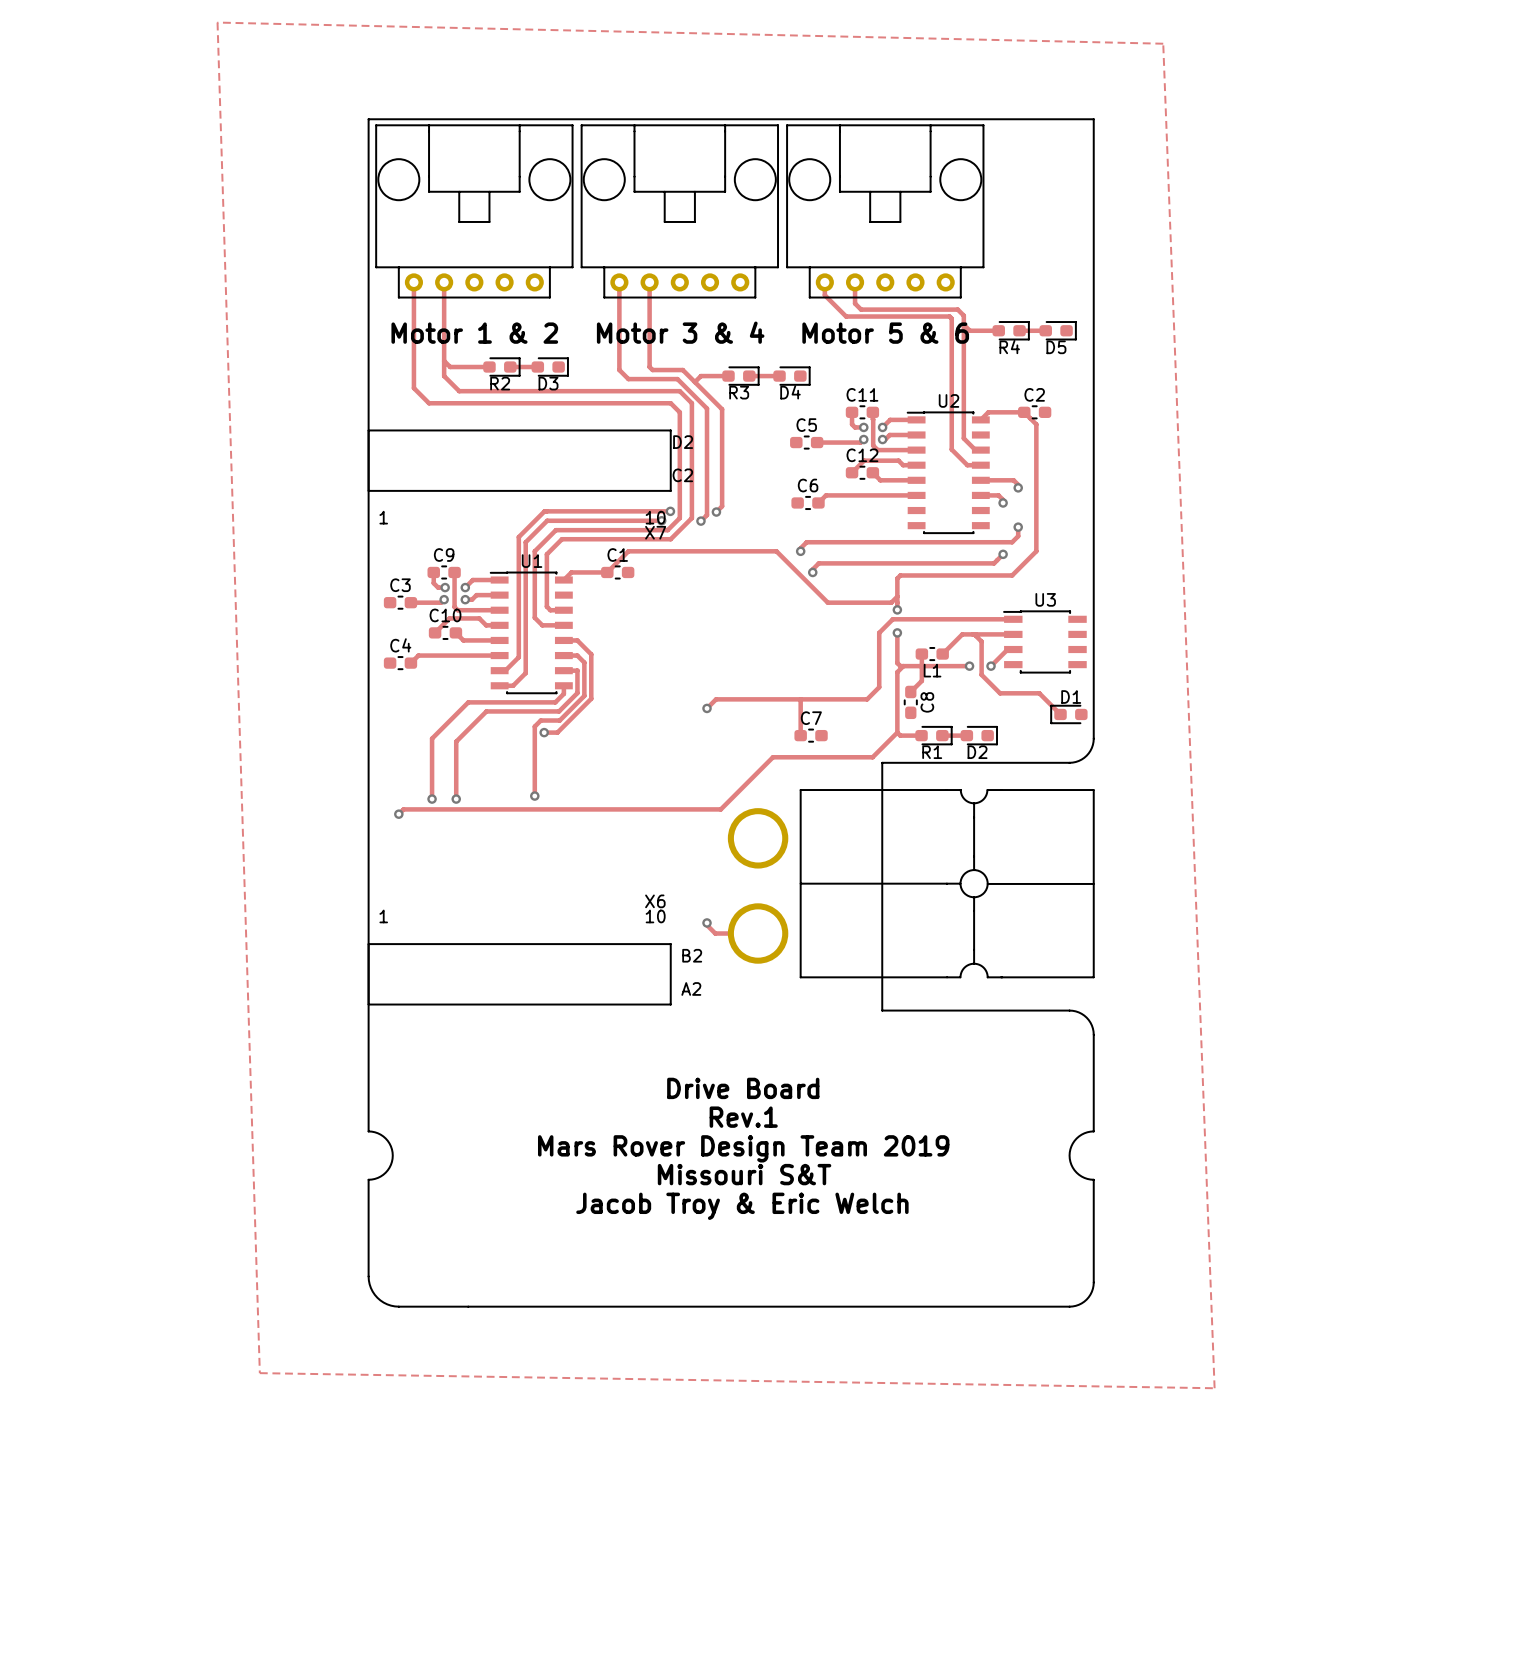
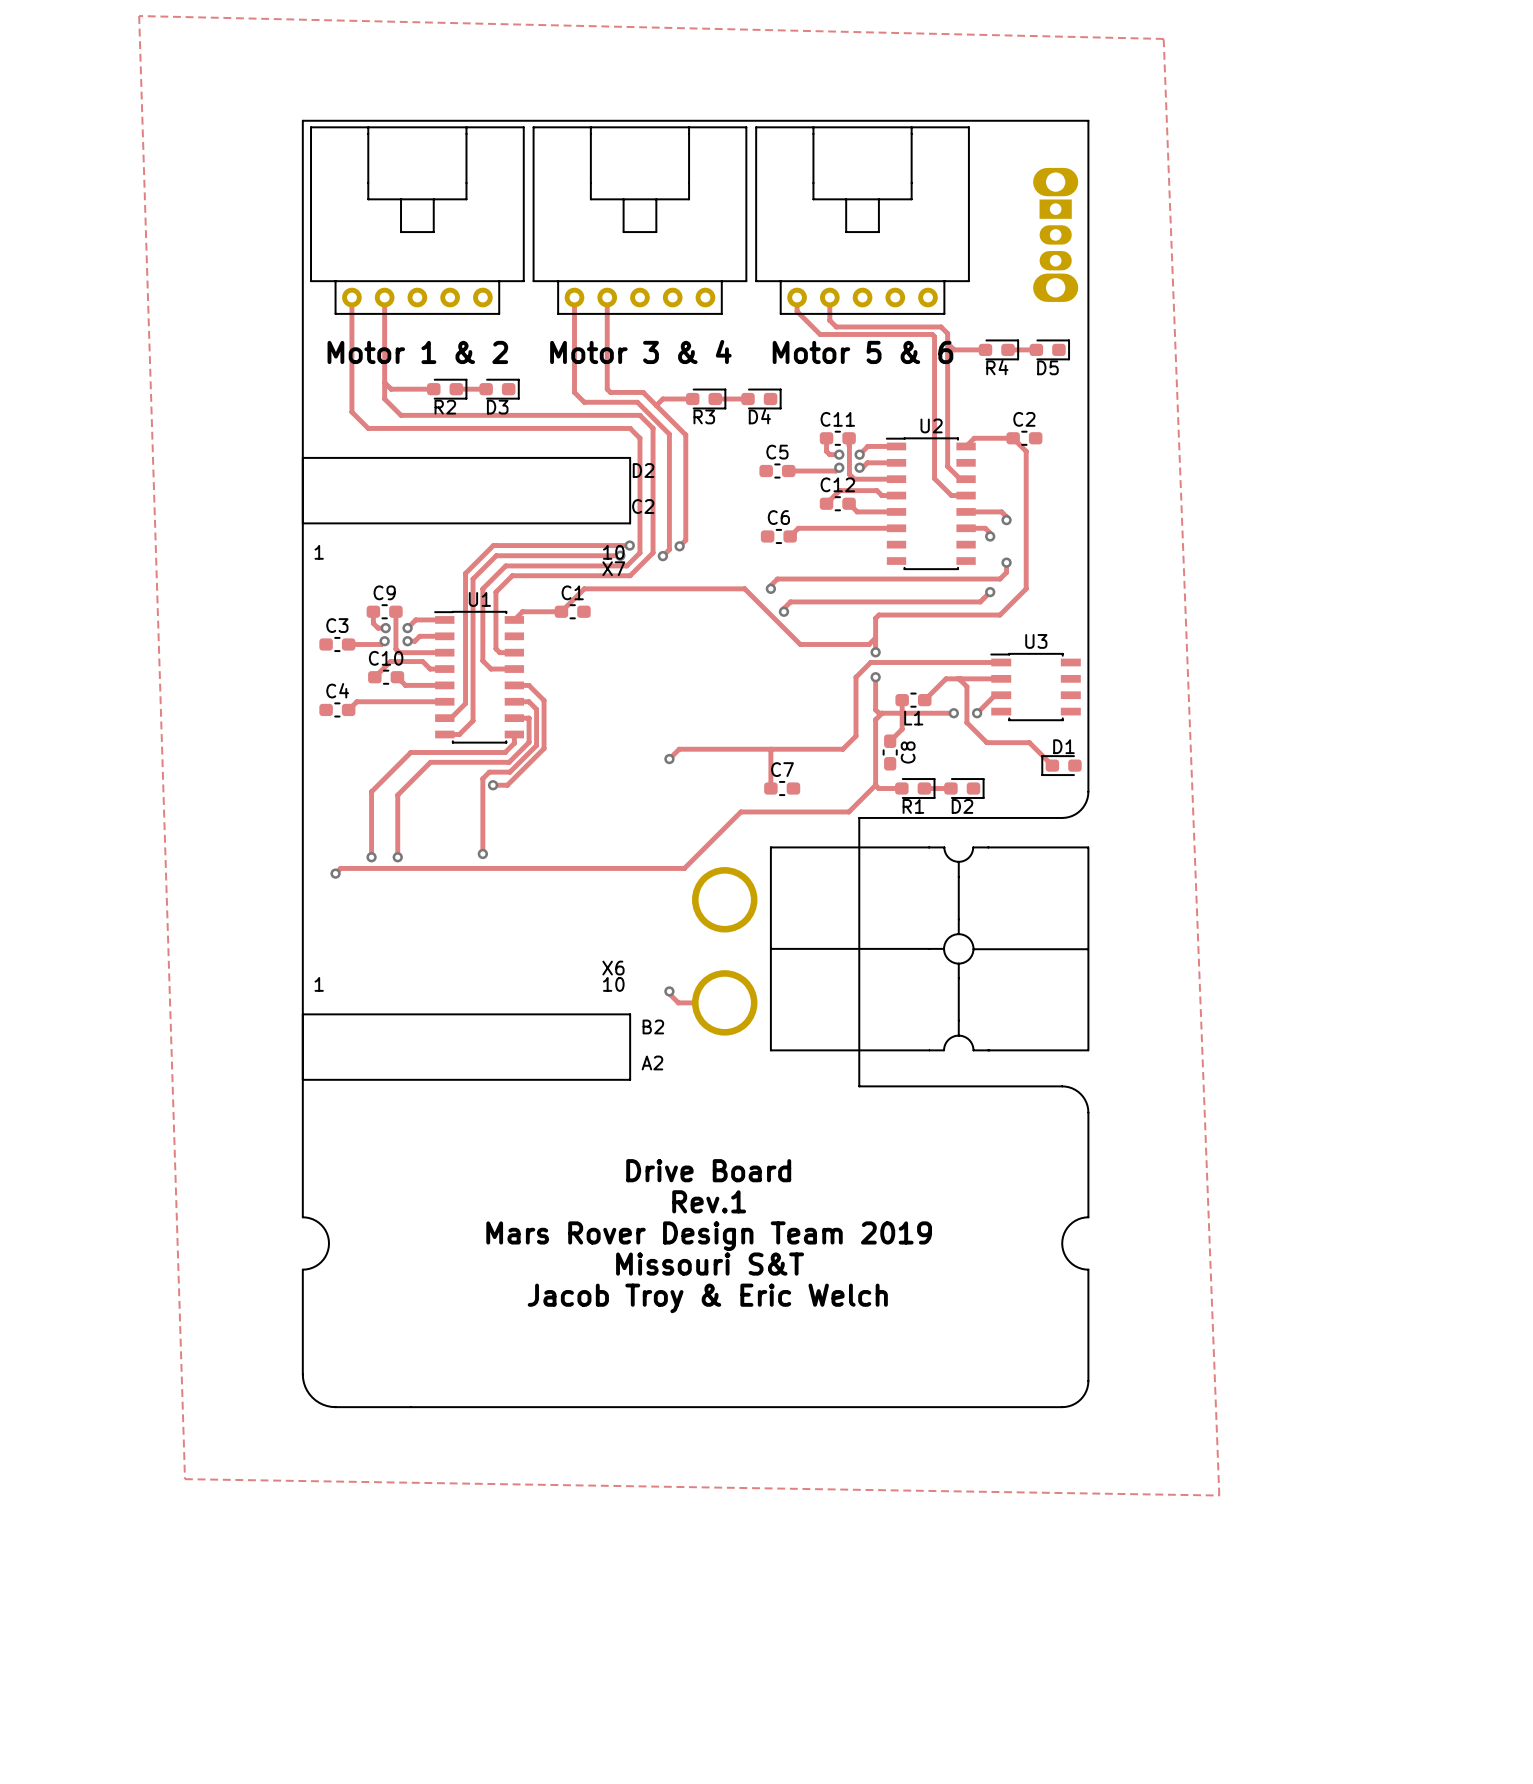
part footprint: [375, 124, 574, 299] -> [310, 126, 525, 315]
part footprint: [580, 124, 779, 299] -> [532, 126, 748, 315]
part footprint: [786, 124, 985, 299] -> [755, 126, 970, 315]
part: none -> (1055, 234)

